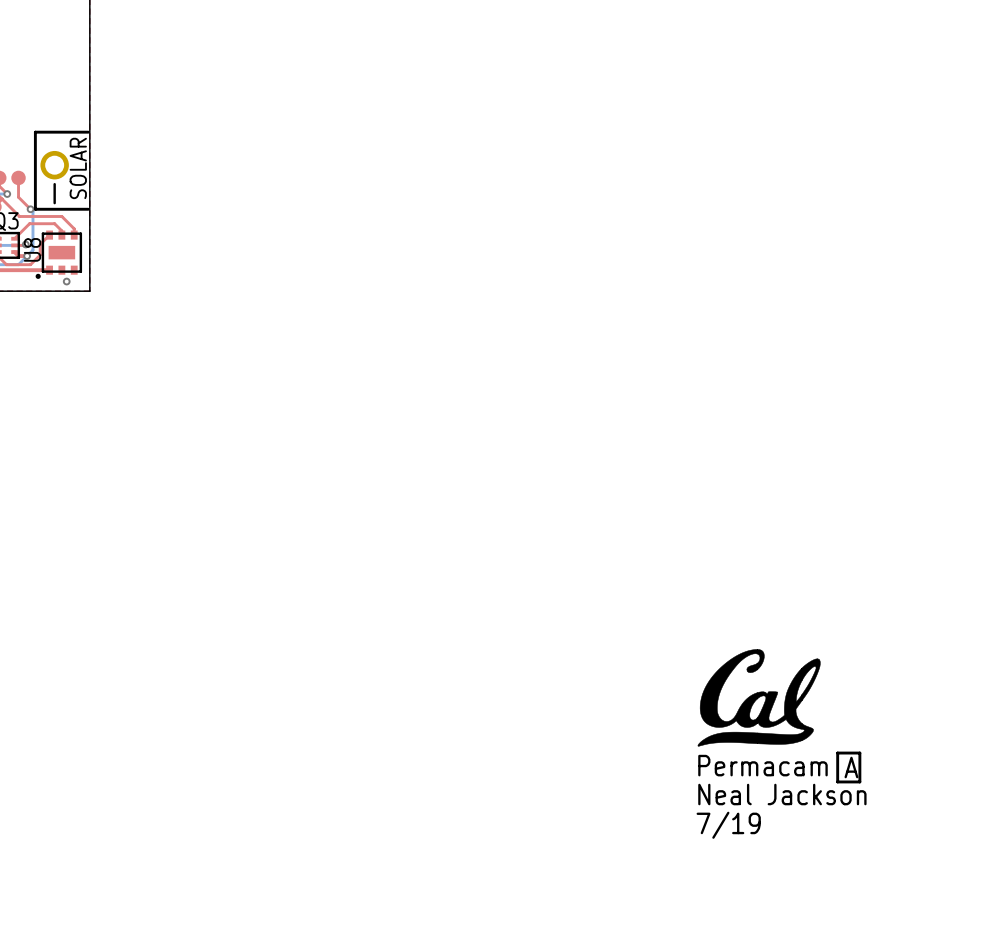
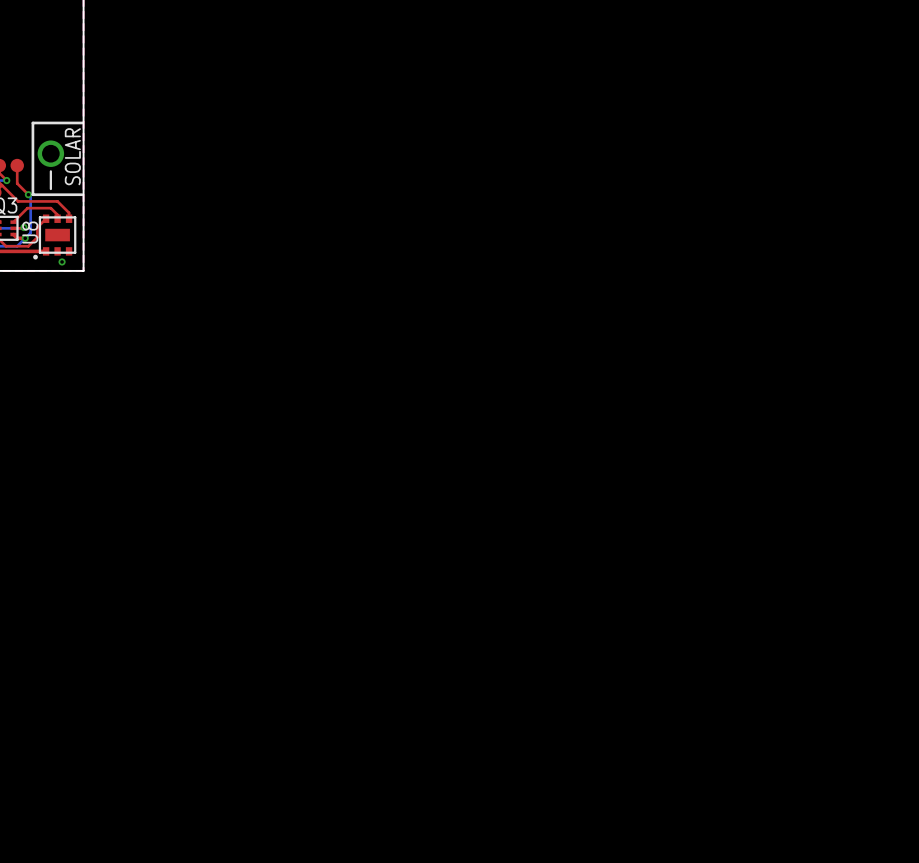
drawing: [697, 649, 821, 747] -> none
line: (837, 753) (837, 781) (859, 781) (859, 753) (837, 753) -> none
text: Permacam (762, 765) -> none
text: A (851, 767) -> none
text: Neal Jackson (782, 794) -> none
text: 7/19 (728, 825) -> none

